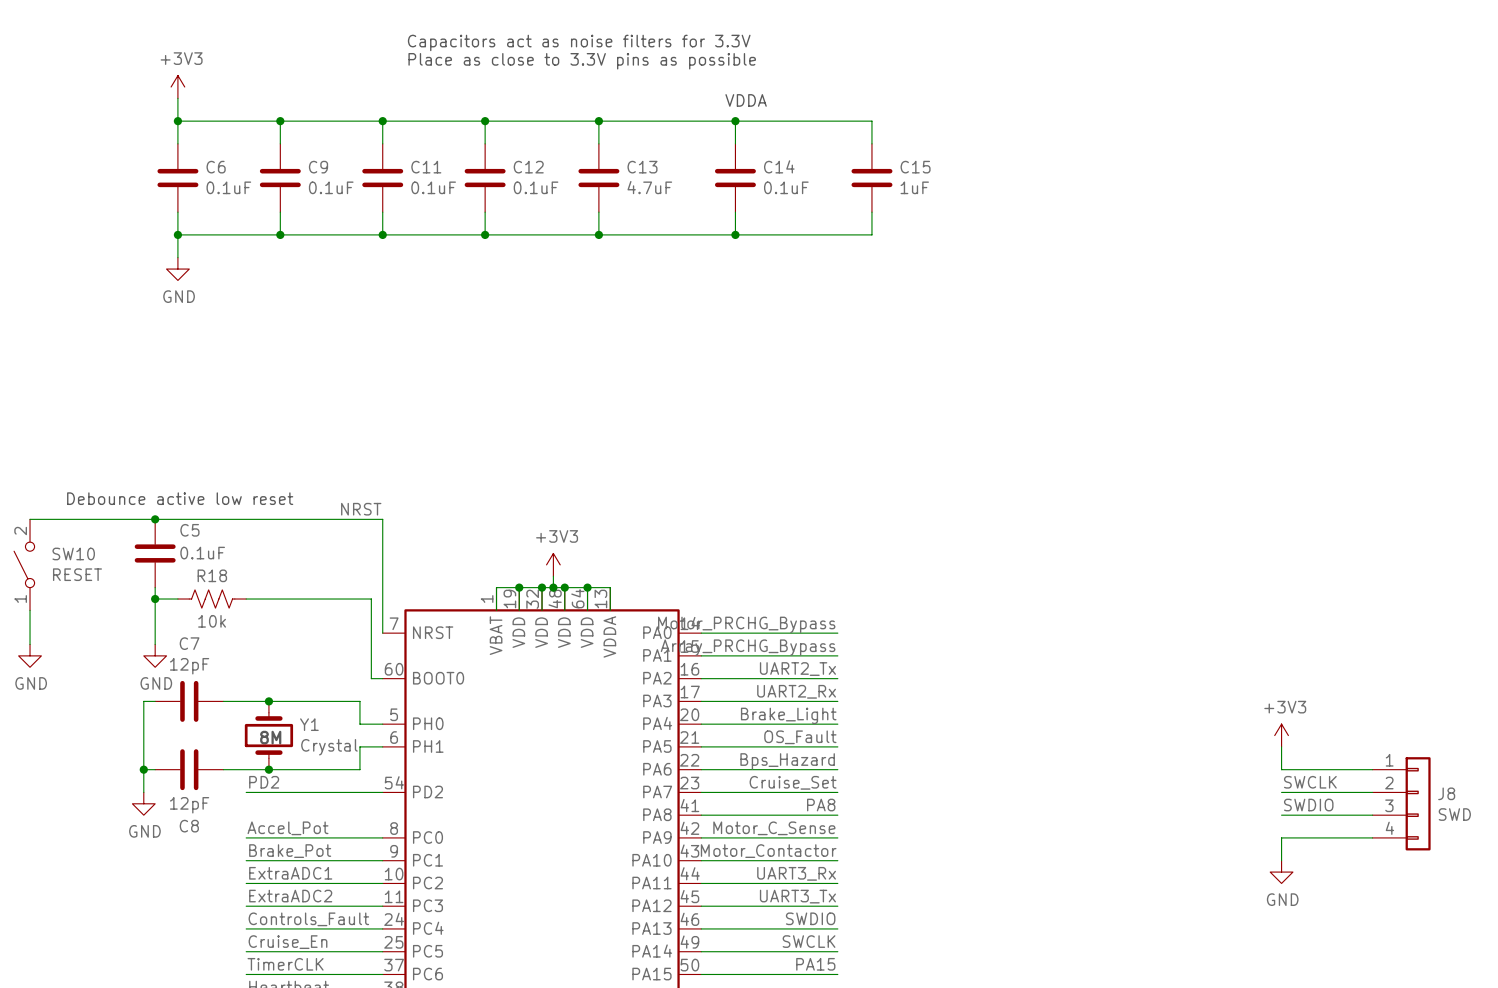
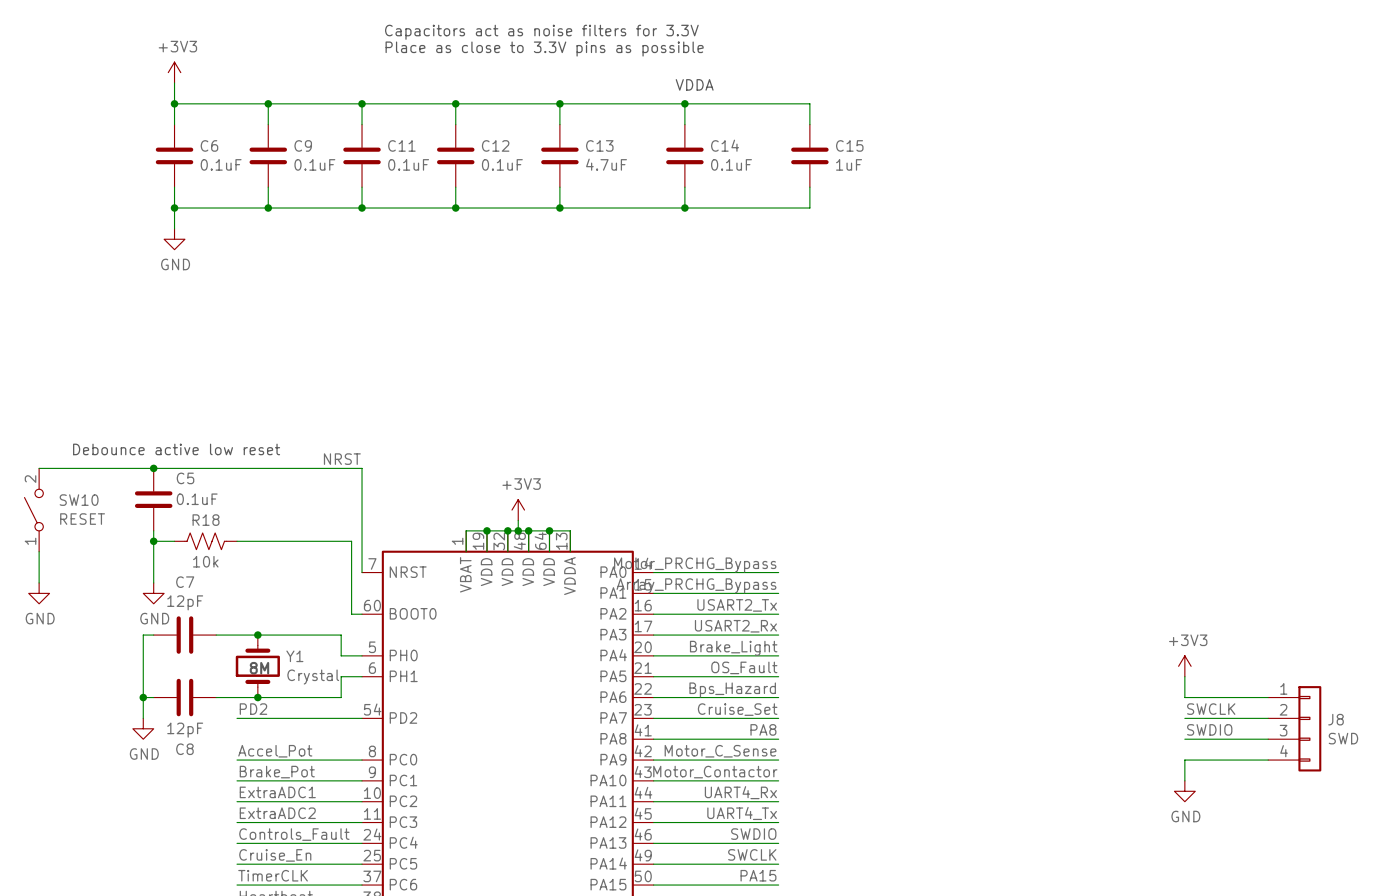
label: UART2_Tx (797, 669) -> USART2_Tx (737, 605)
label: UART2_Rx (796, 691) -> USART2_Rx (735, 626)
label: UART3_Rx (796, 873) -> UART4_Rx (740, 792)
label: UART3_Tx (797, 896) -> UART4_Tx (742, 813)

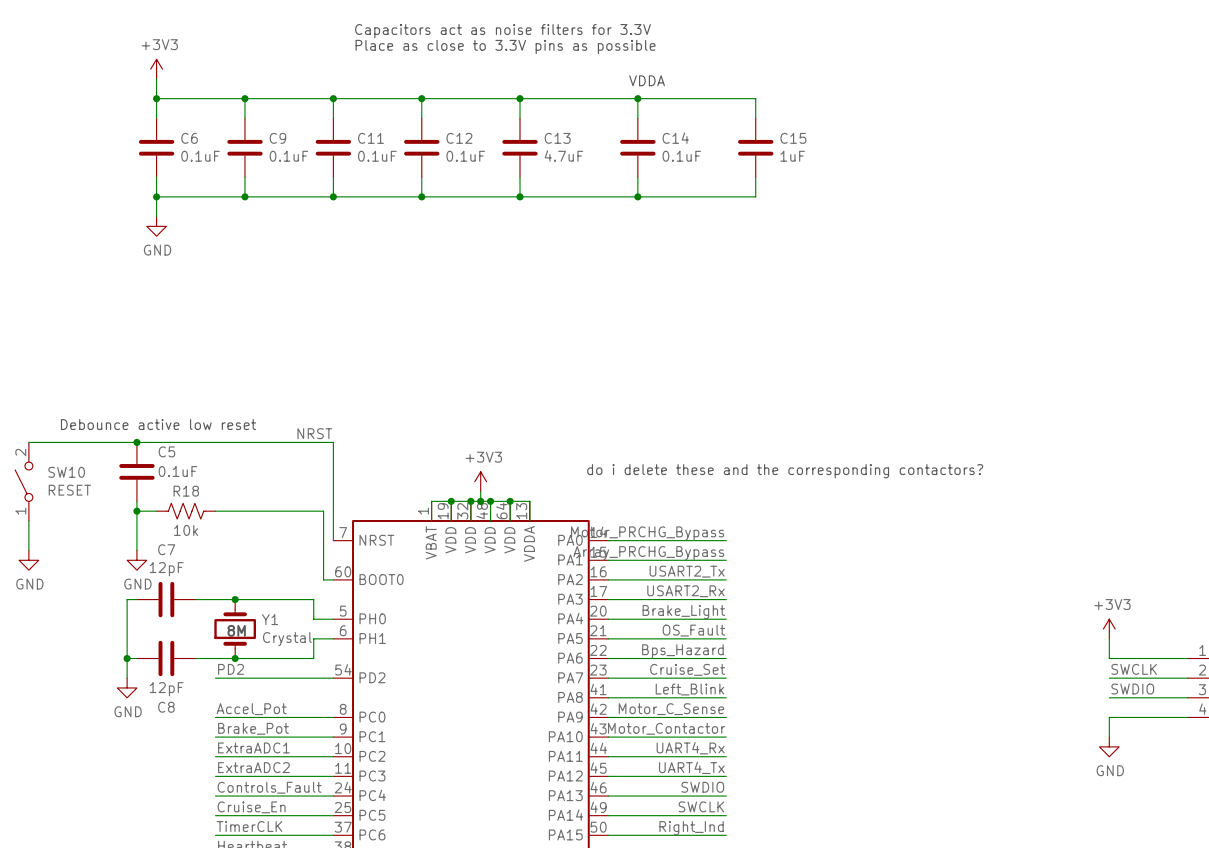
text: none -> do i delete these and the corresponding contactors? (785, 471)
label: PA8 (763, 729) -> Left_Blink (689, 689)
label: PA15 (758, 875) -> Right_Ind (691, 828)

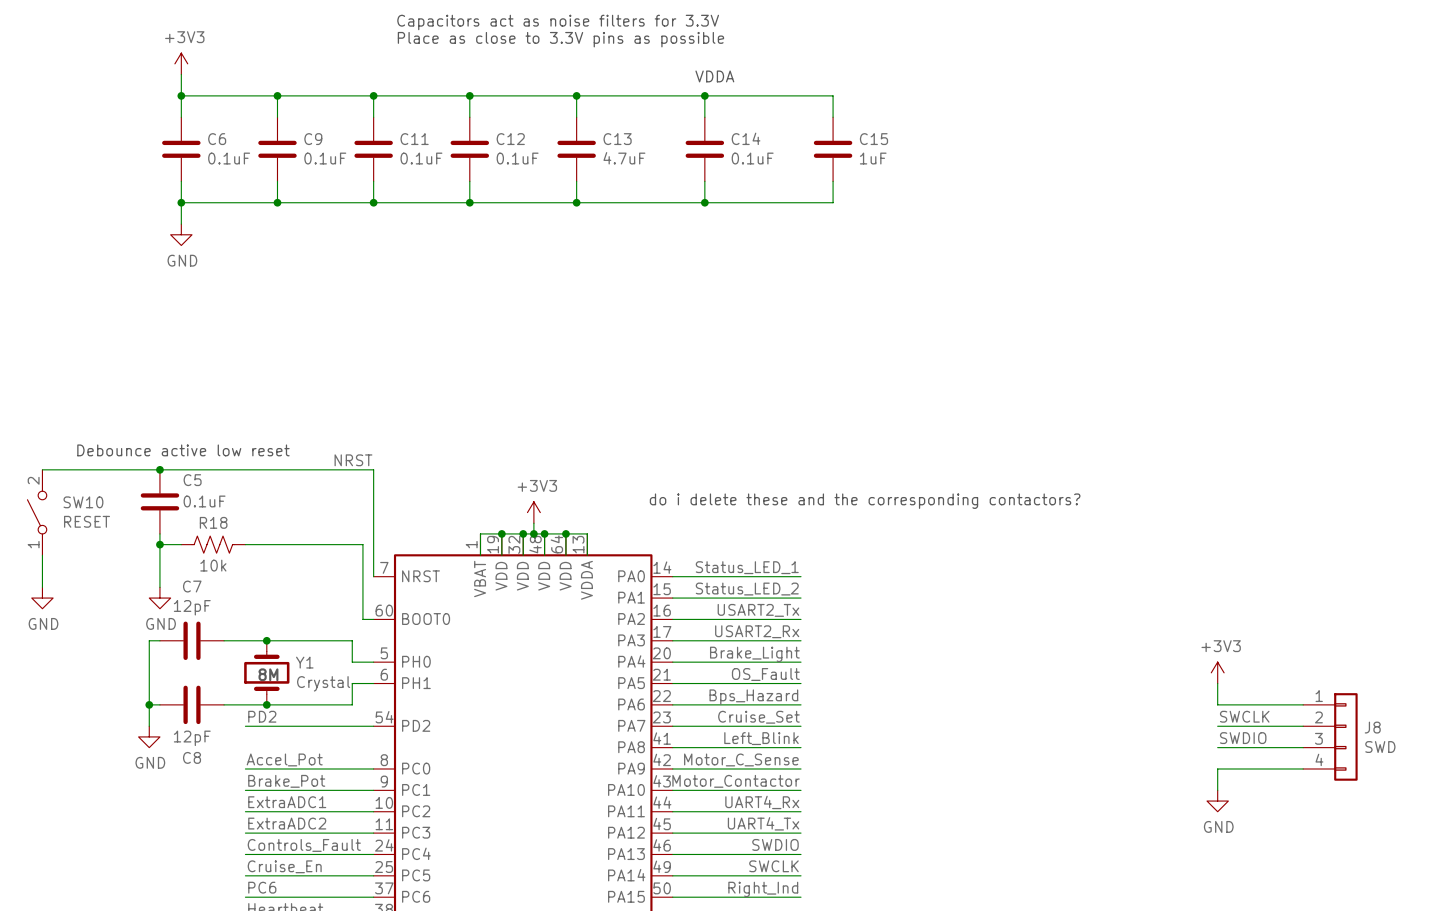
label: Motor_PRCHG_Bypass (647, 533) -> Status_LED_1 (747, 567)
label: Array_PRCHG_Bypass (648, 553) -> Status_LED_2 (747, 589)
label: TimerCLK (249, 826) -> PC6 (262, 887)

